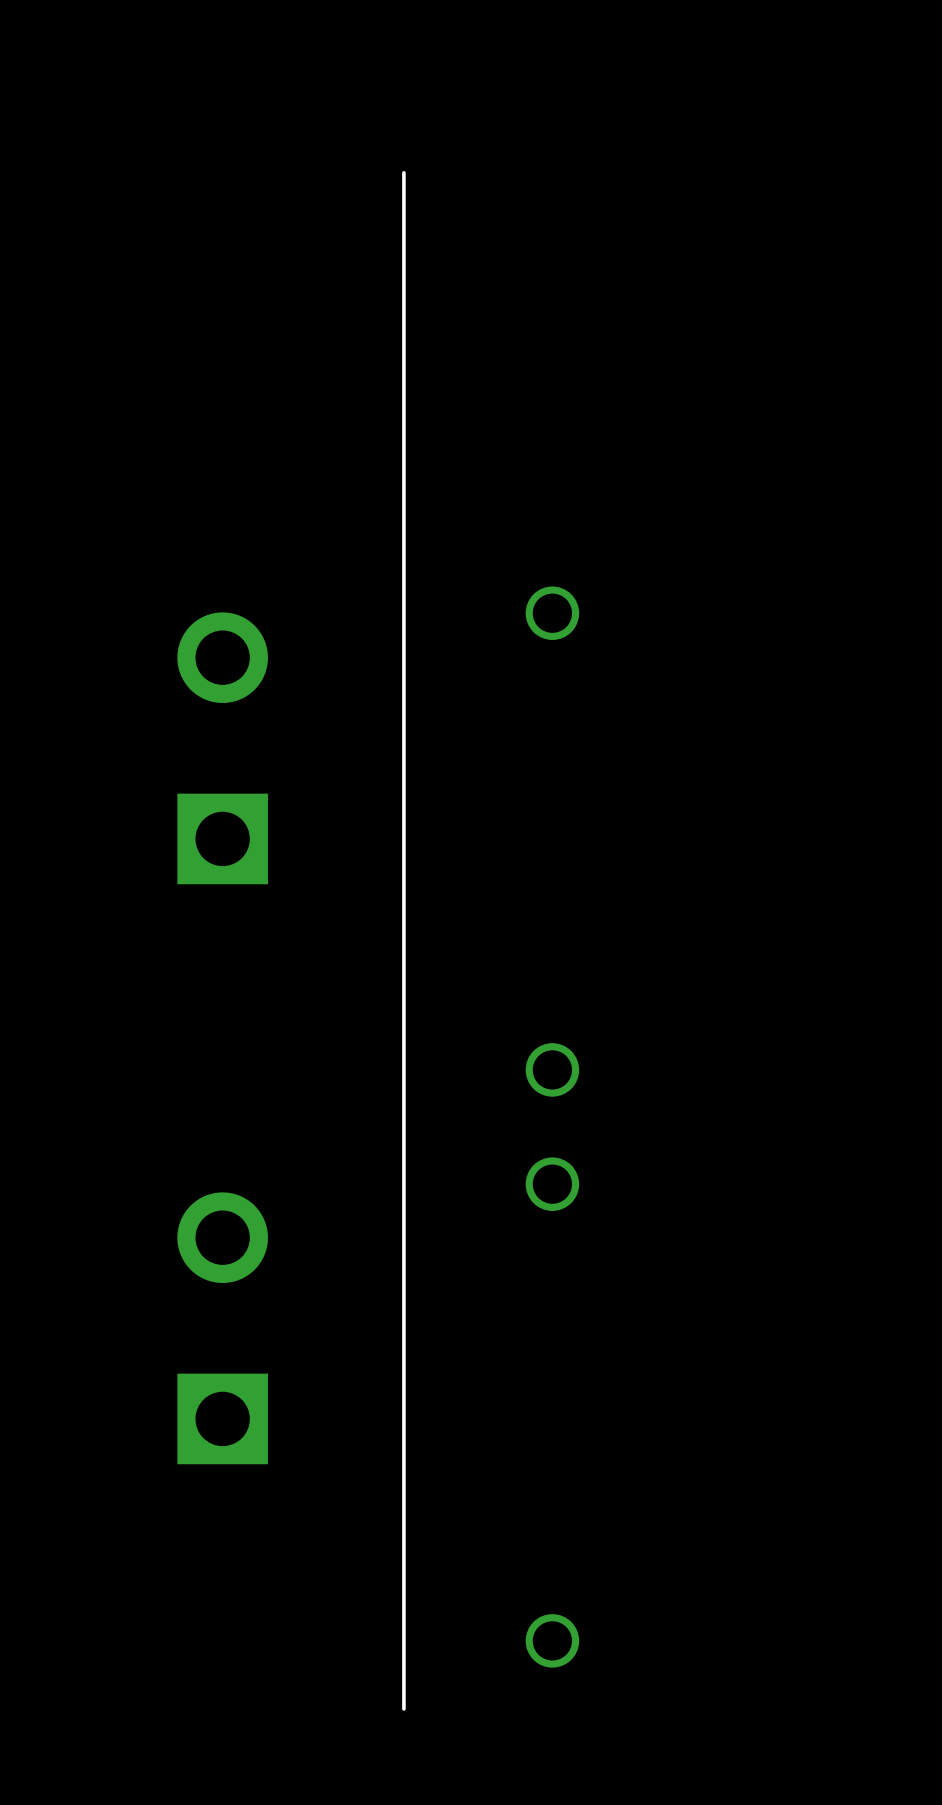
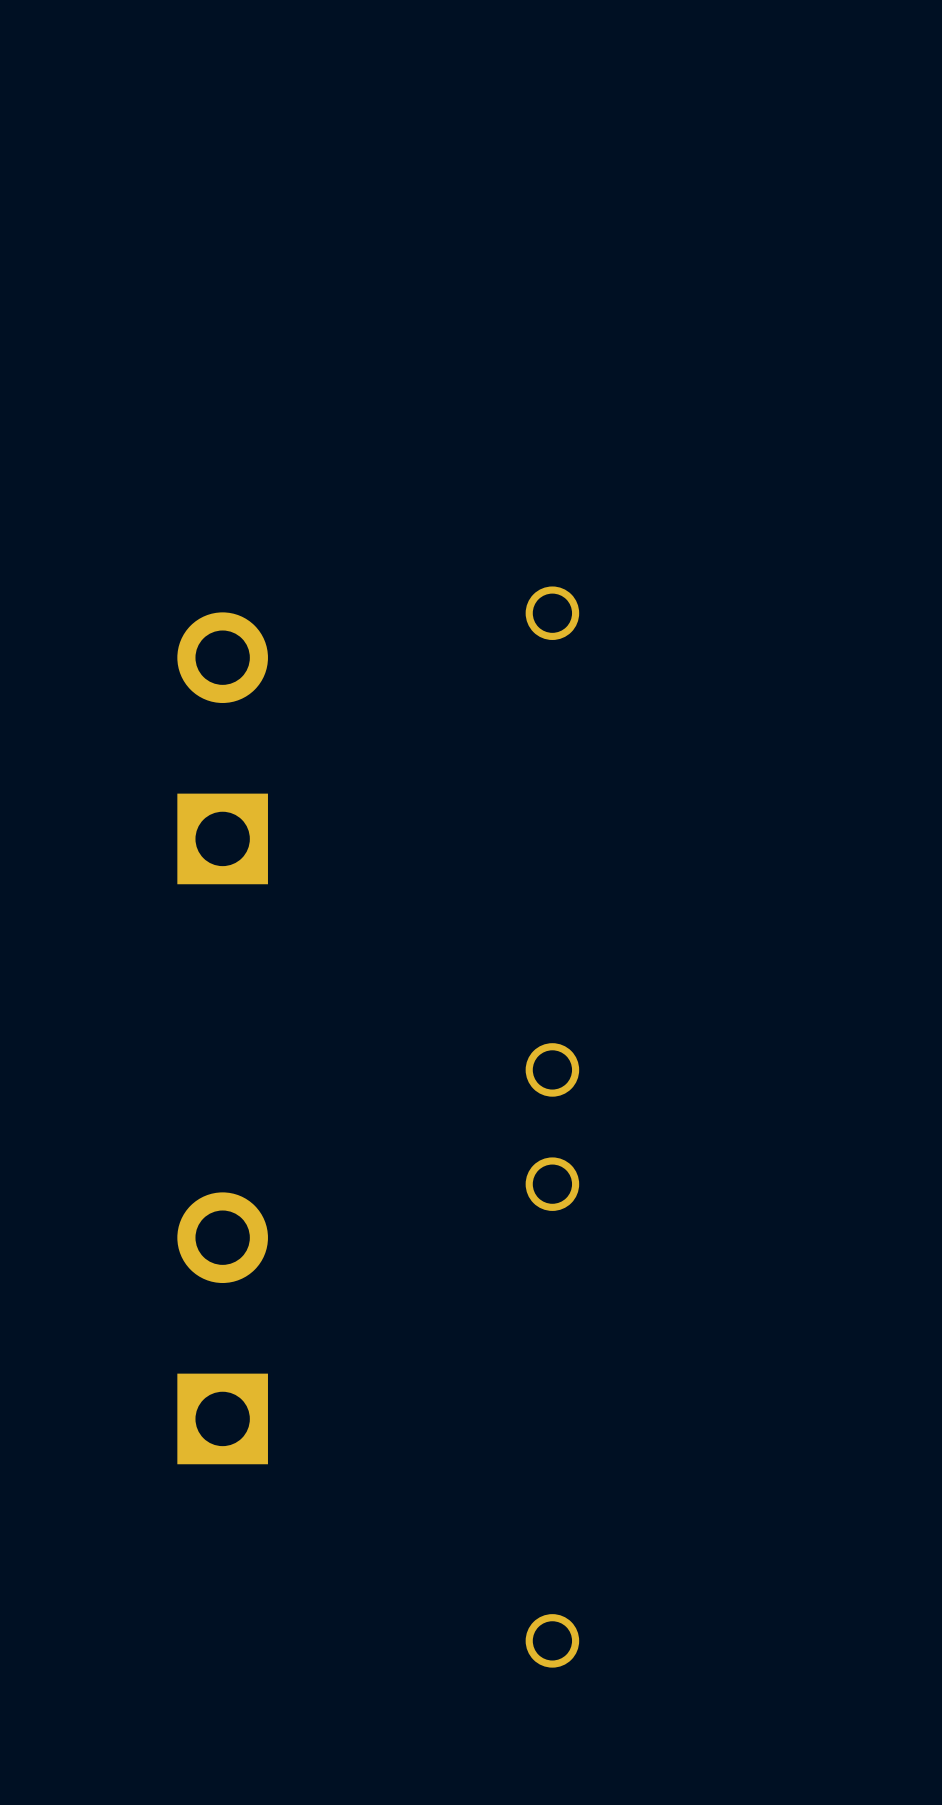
board edge: (403, 172) (403, 1708) -> none

